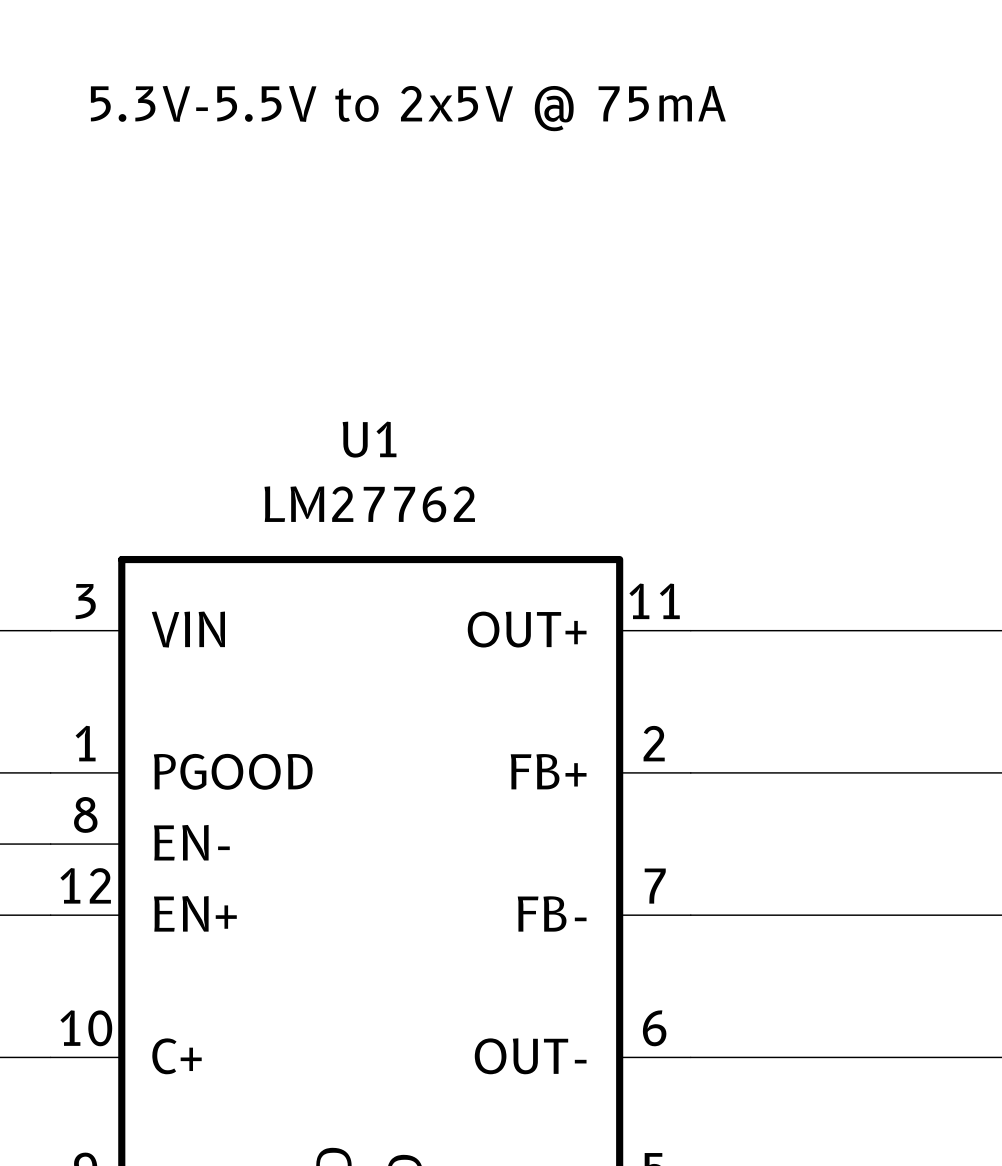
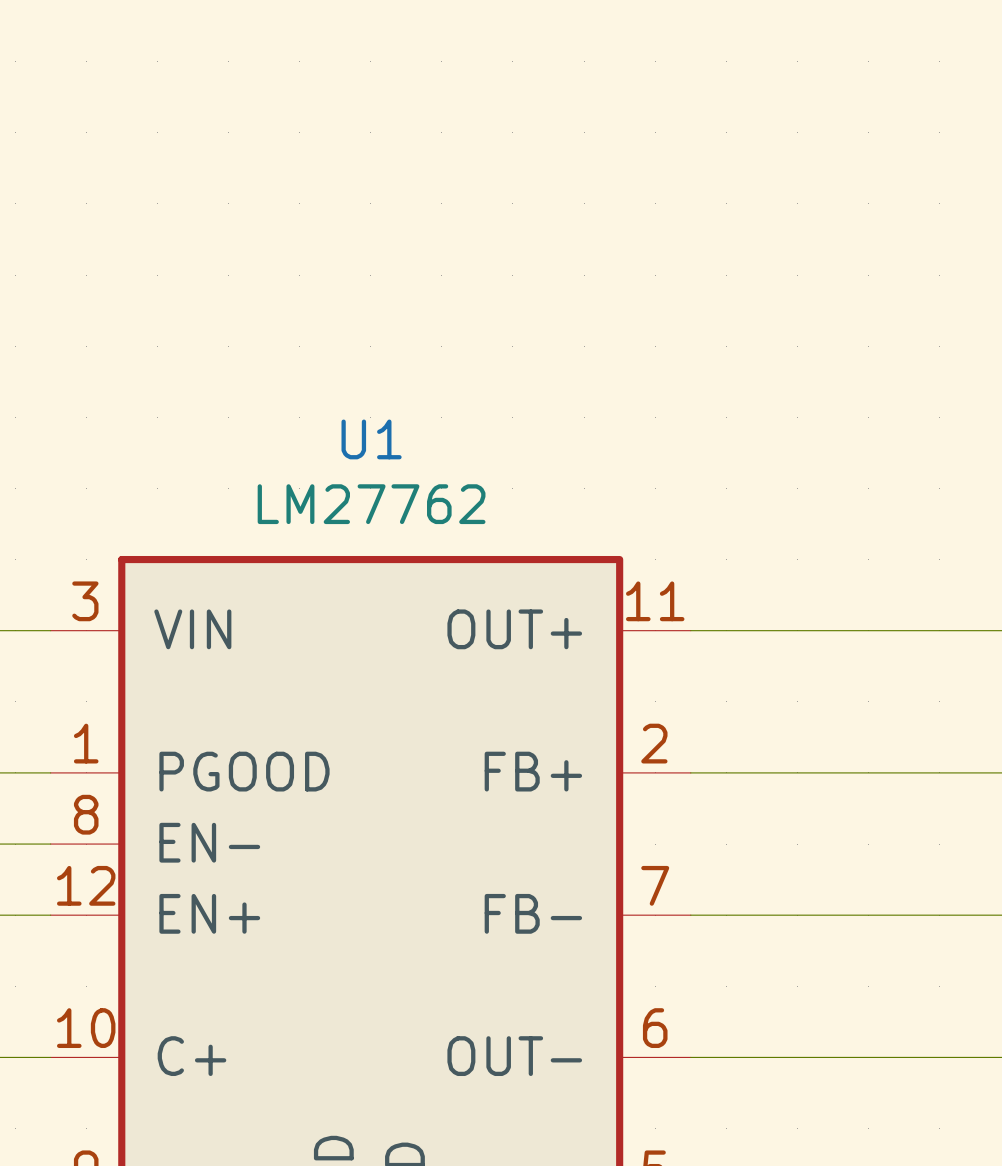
text: 5.3V-5.5V to 2x5V @ 75mA (408, 108) -> none

